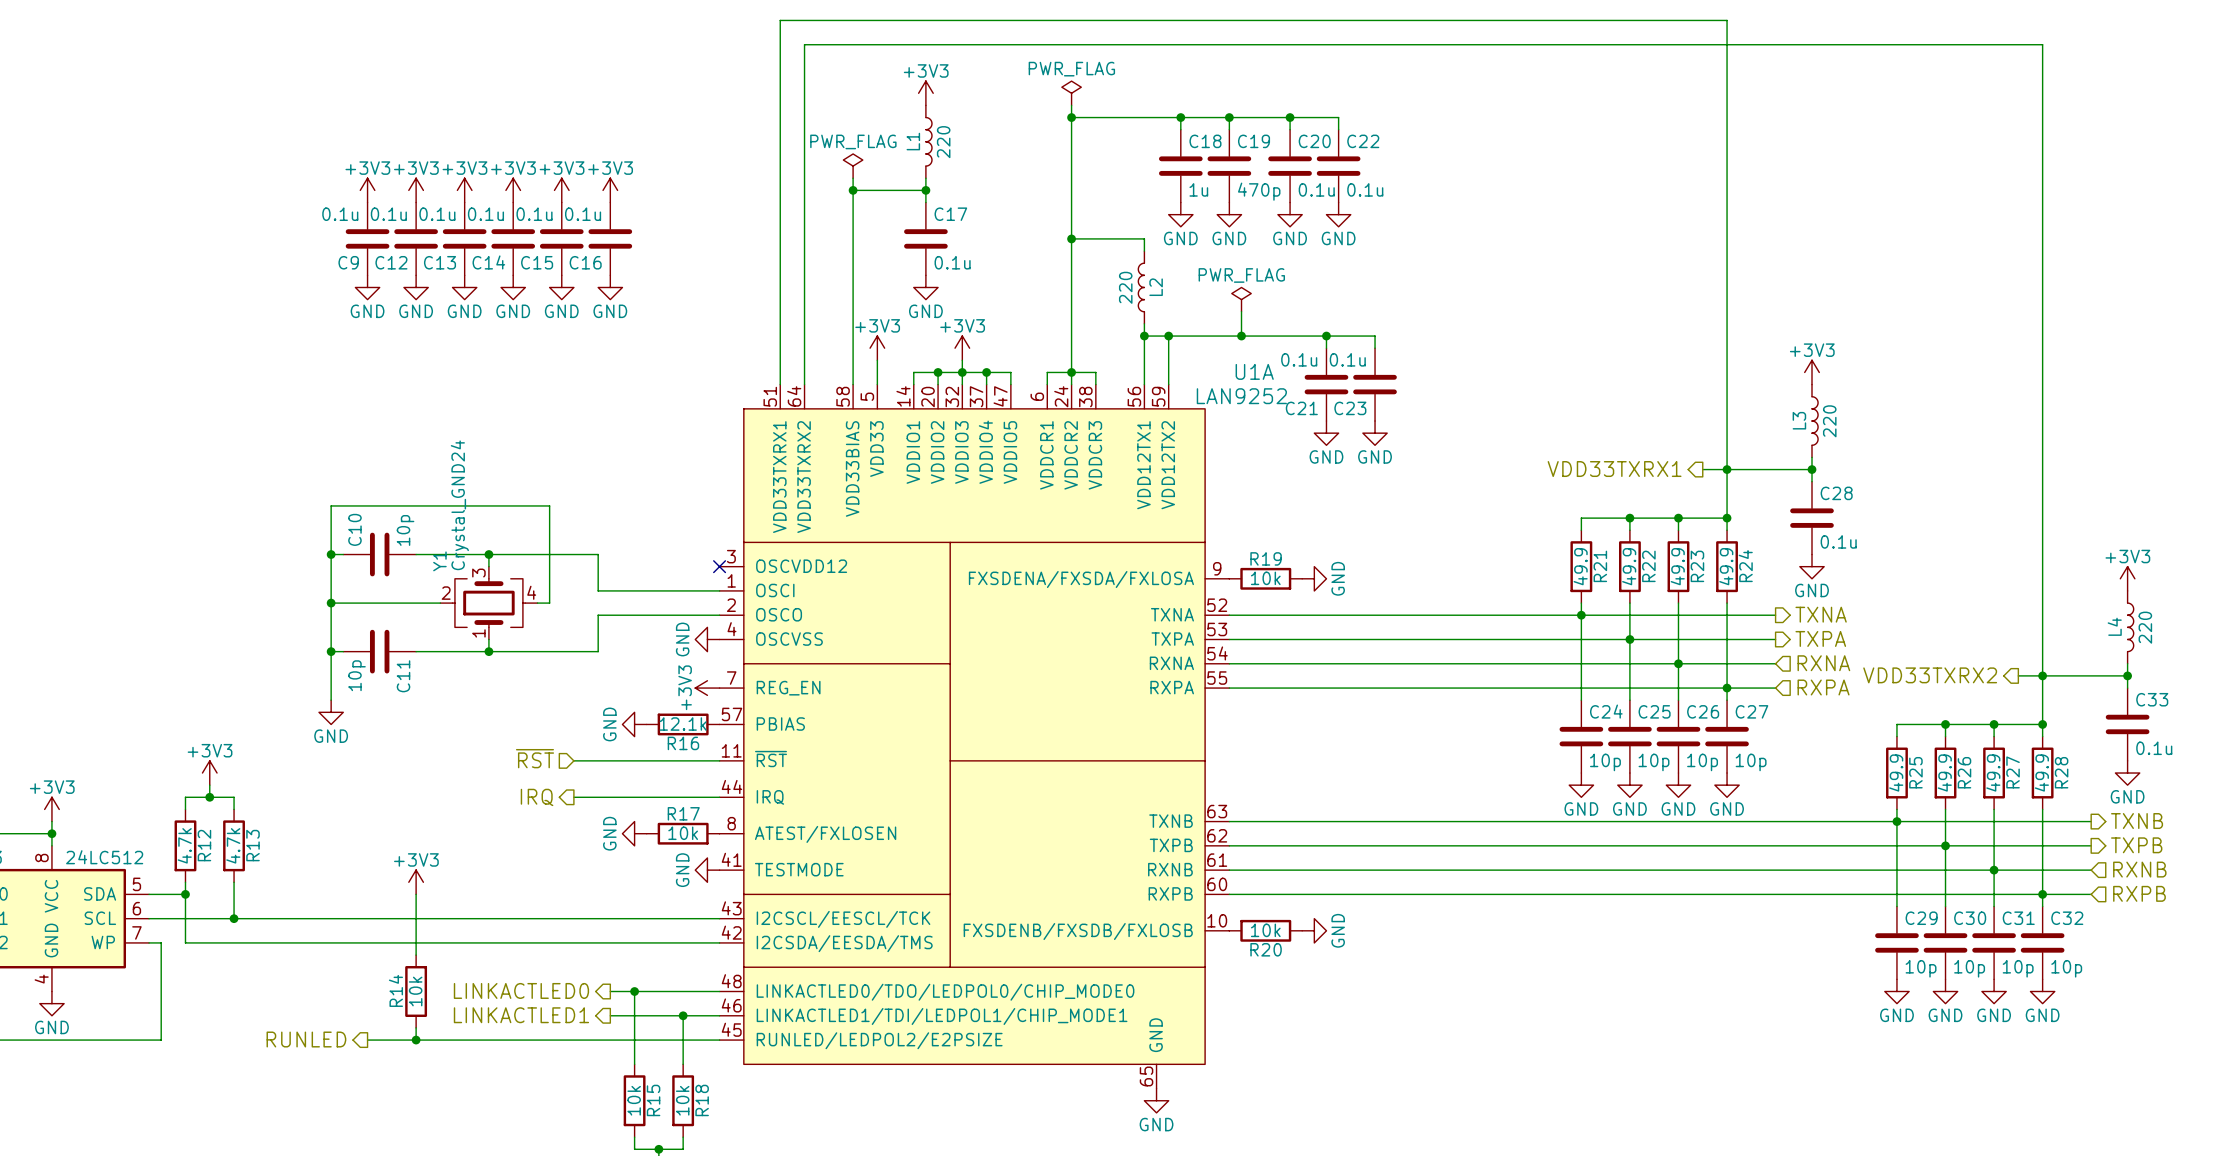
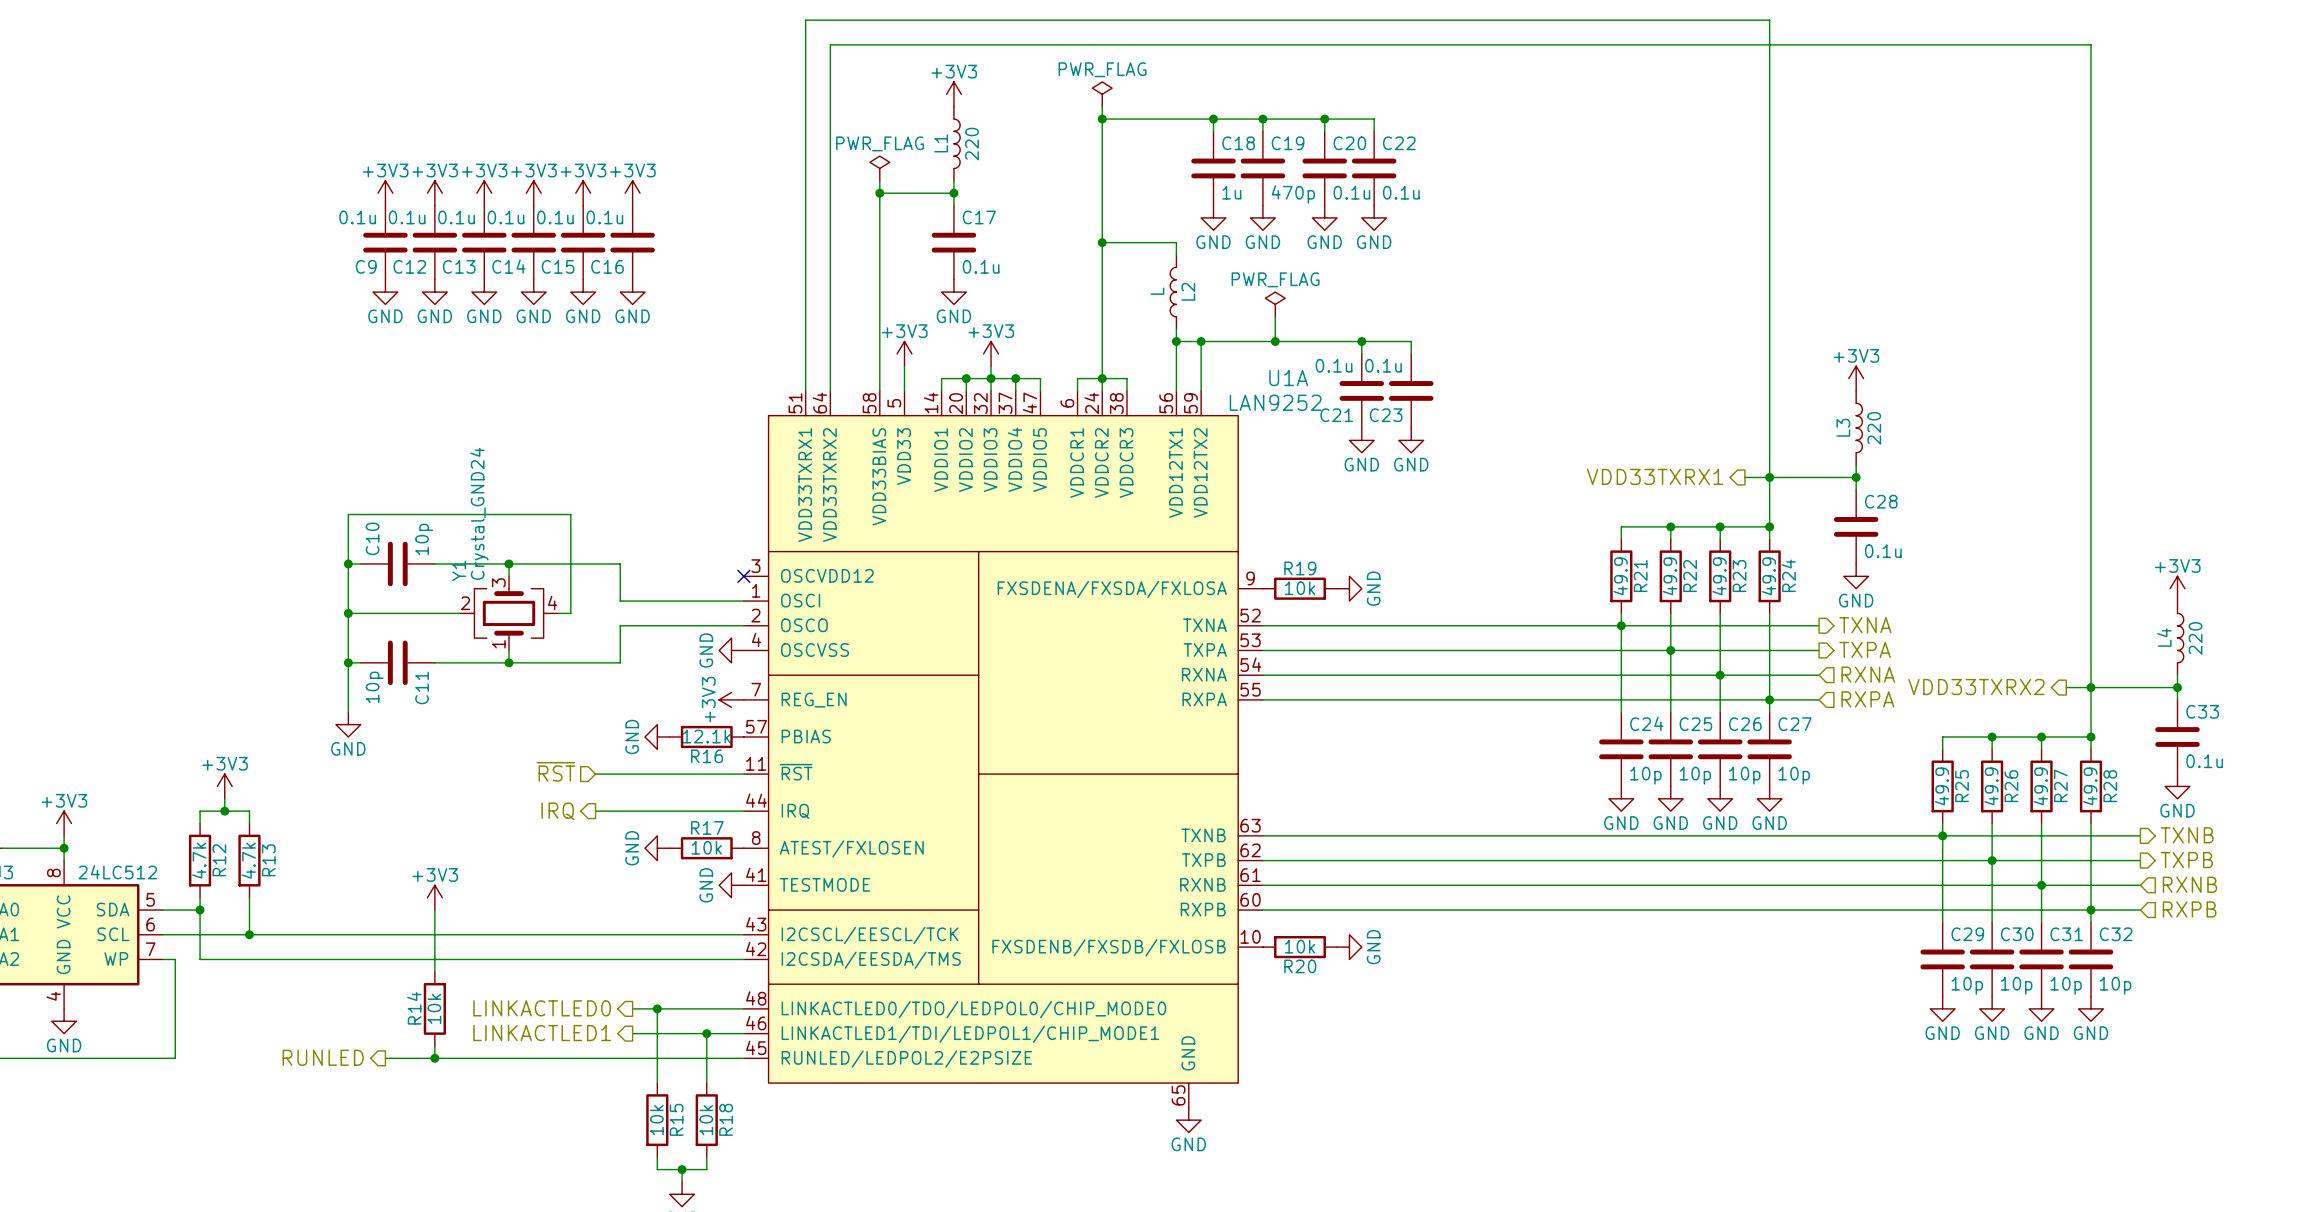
L2 value: 220 (1125, 287) -> L (1157, 291)

